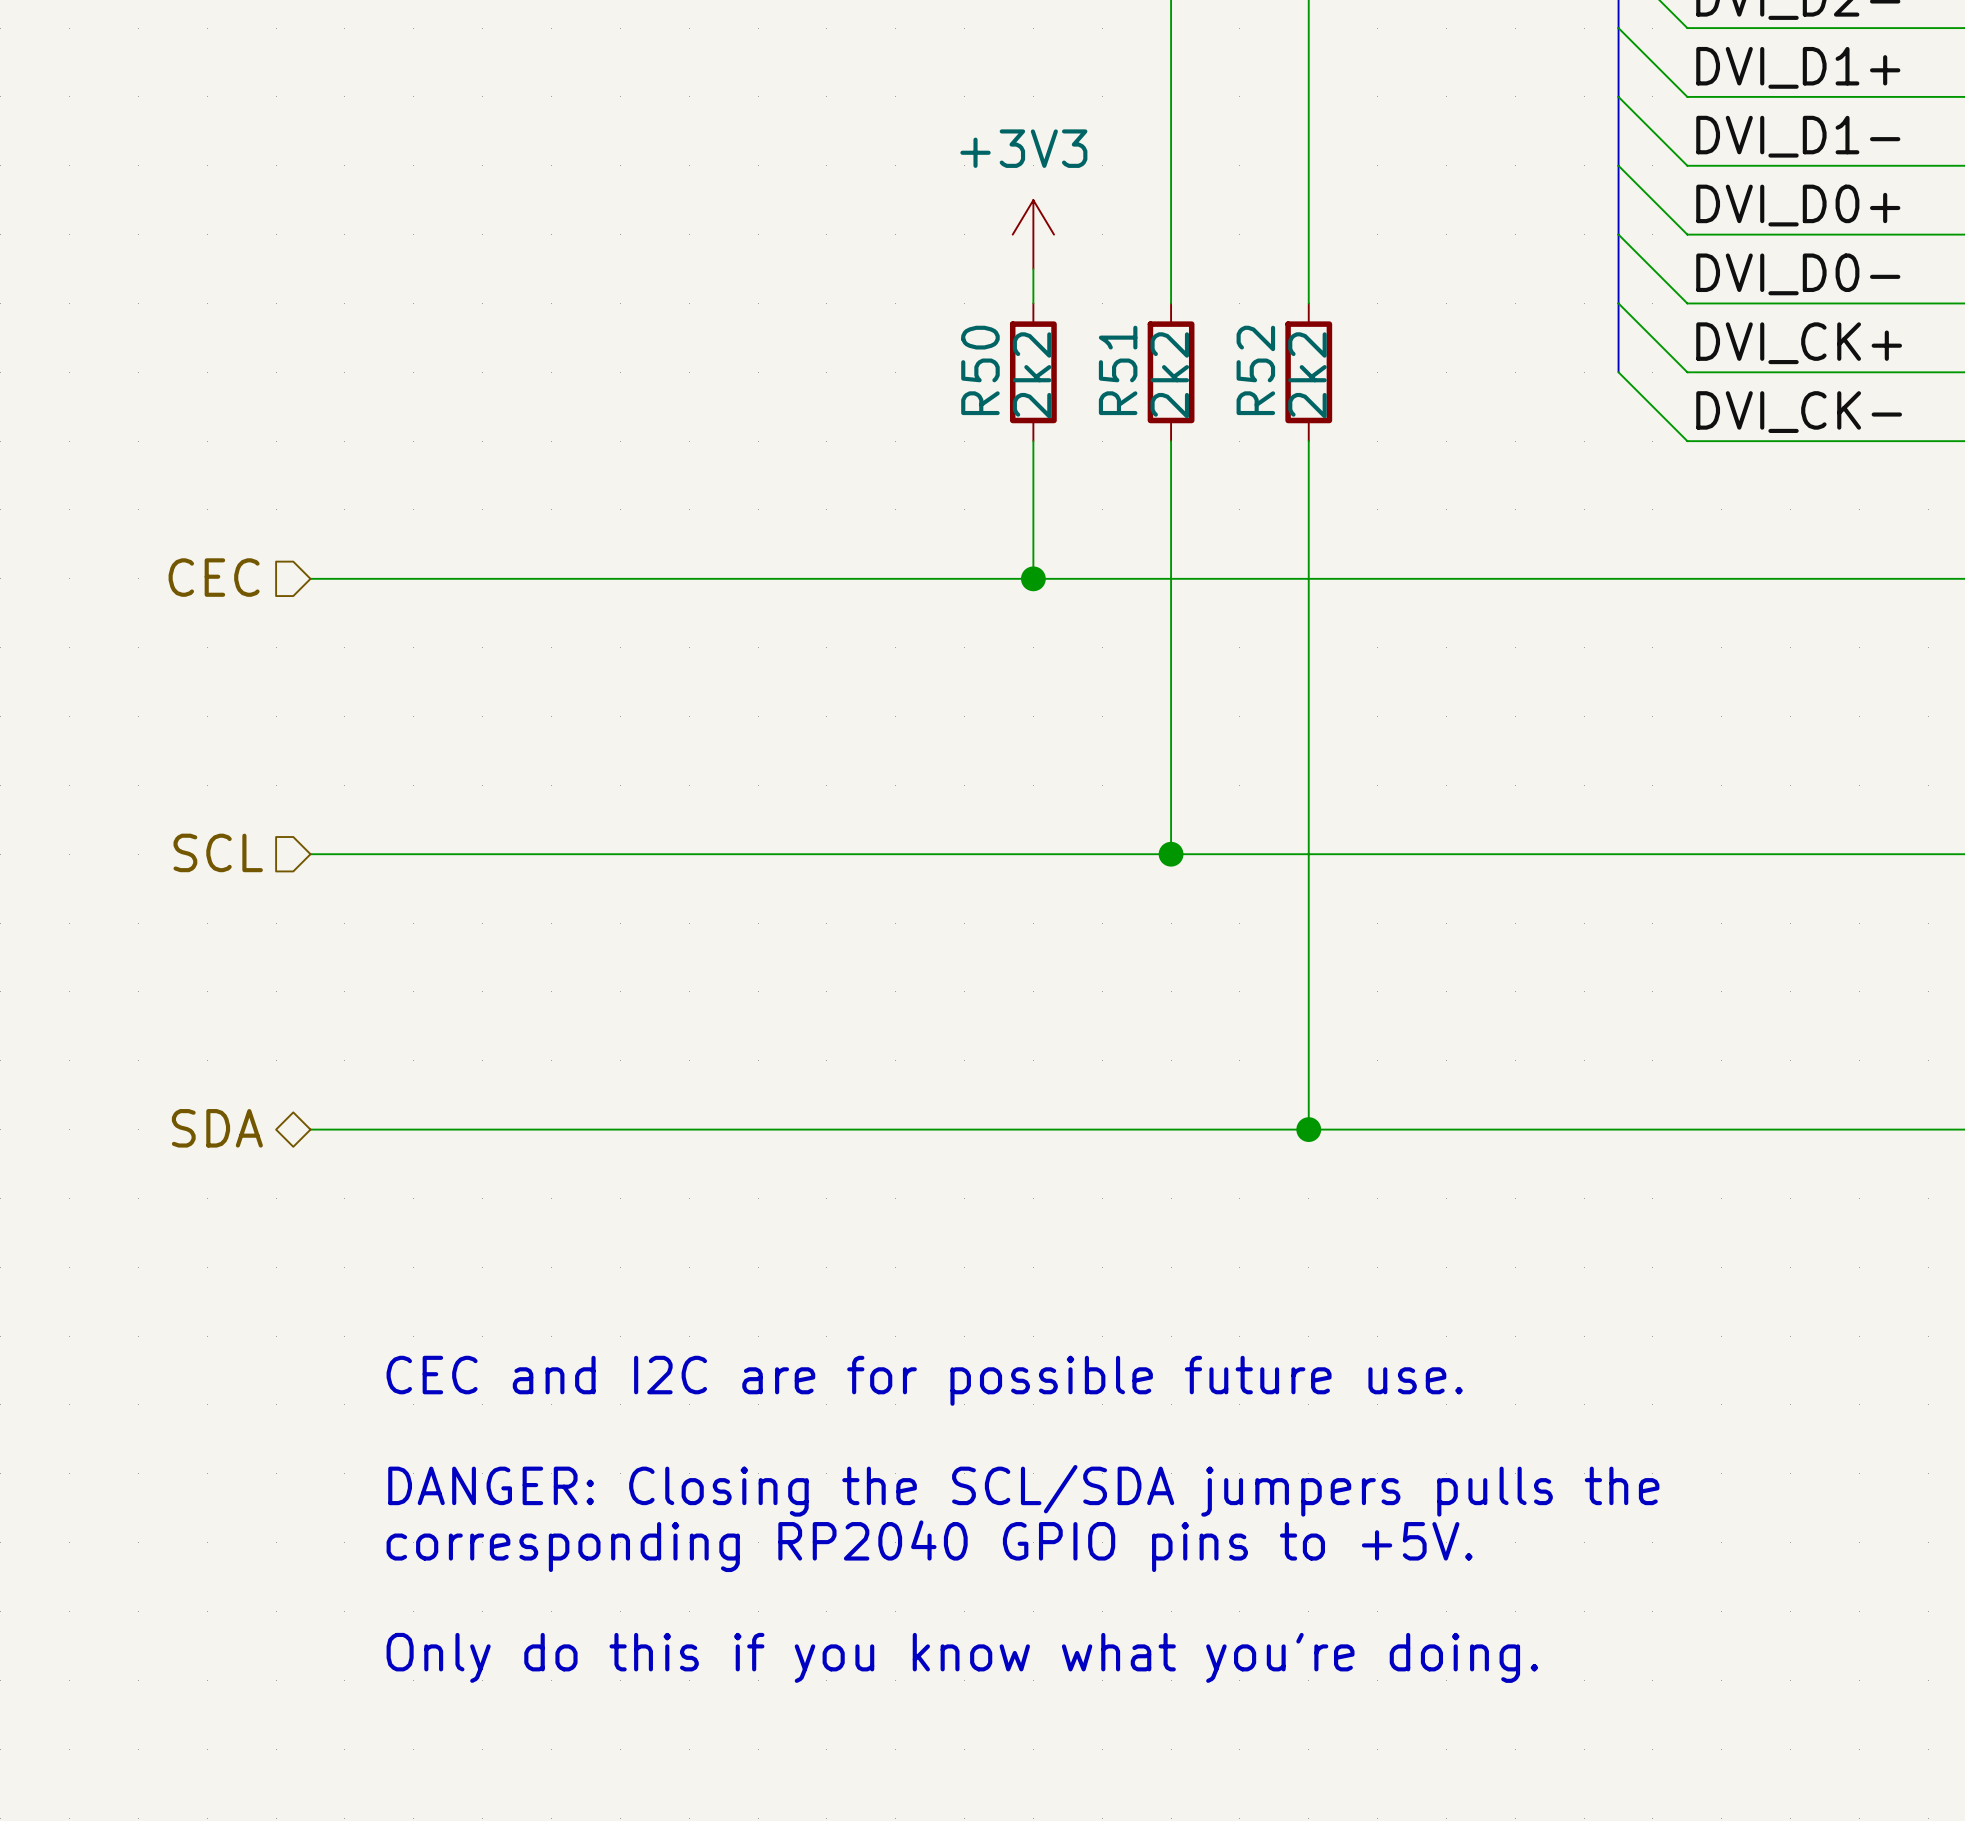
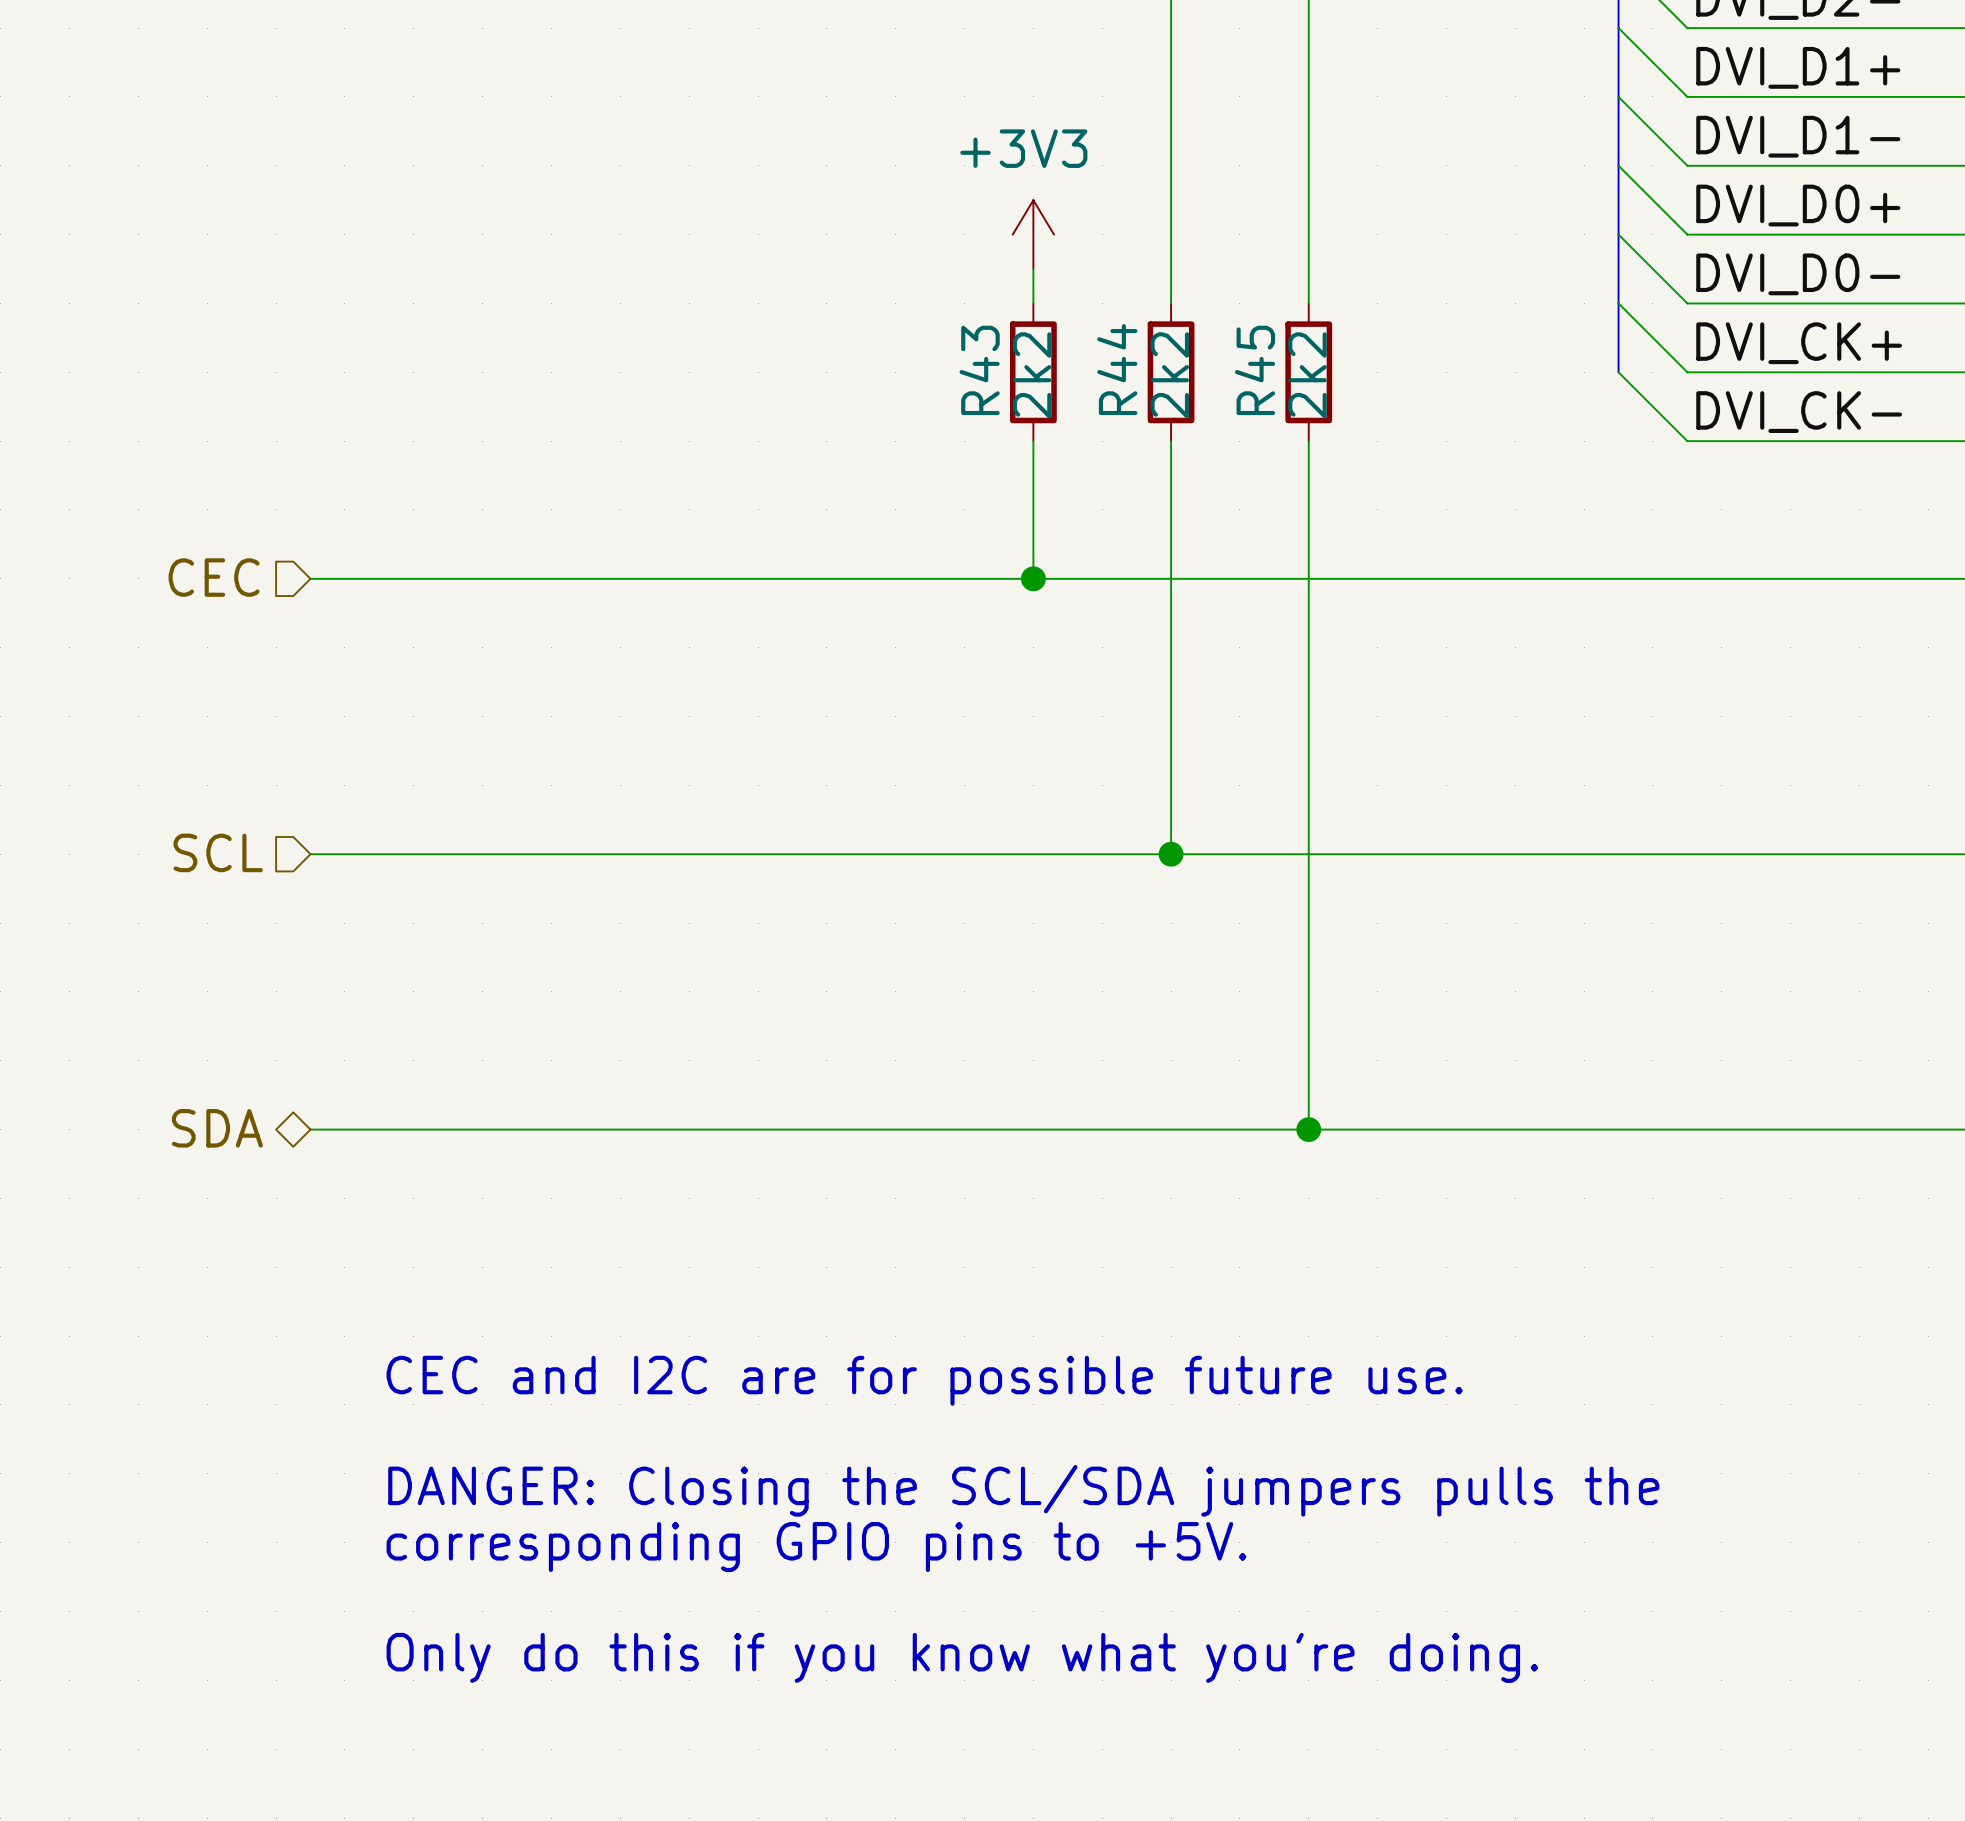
R50 name: R50 (980, 370) -> R43 (979, 370)
R51 name: R51 (1118, 370) -> R44 (1117, 369)
R52 name: R52 (1255, 370) -> R45 (1255, 370)
text: corresponding RP2040 GPIO pins to +5V. (929, 1546) -> corresponding GPIO pins to +5V. (816, 1547)

